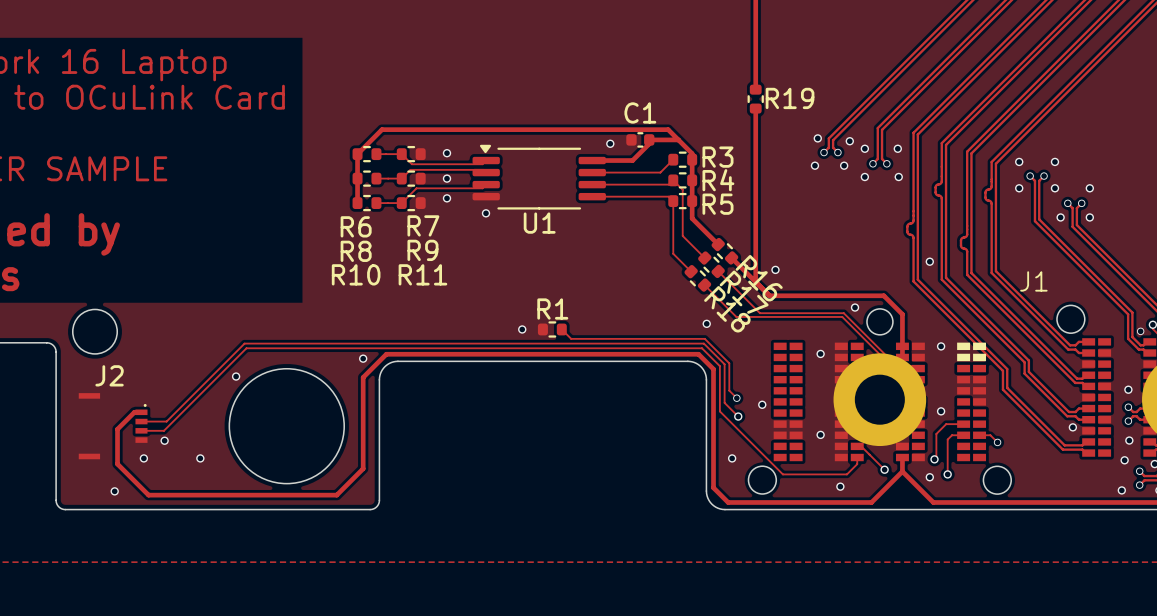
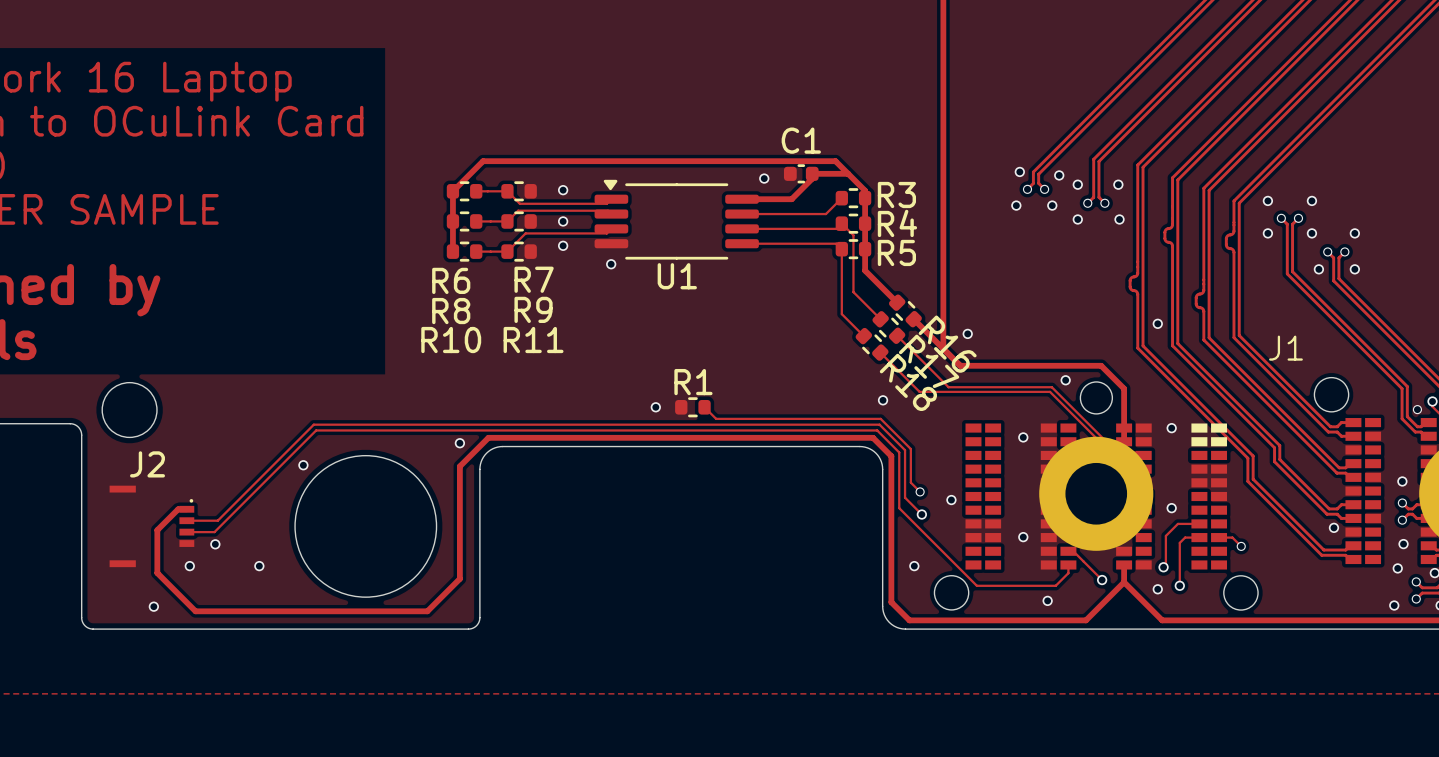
track: none -> (943, 111) (943, 135)
R19: (755, 99) -> none

